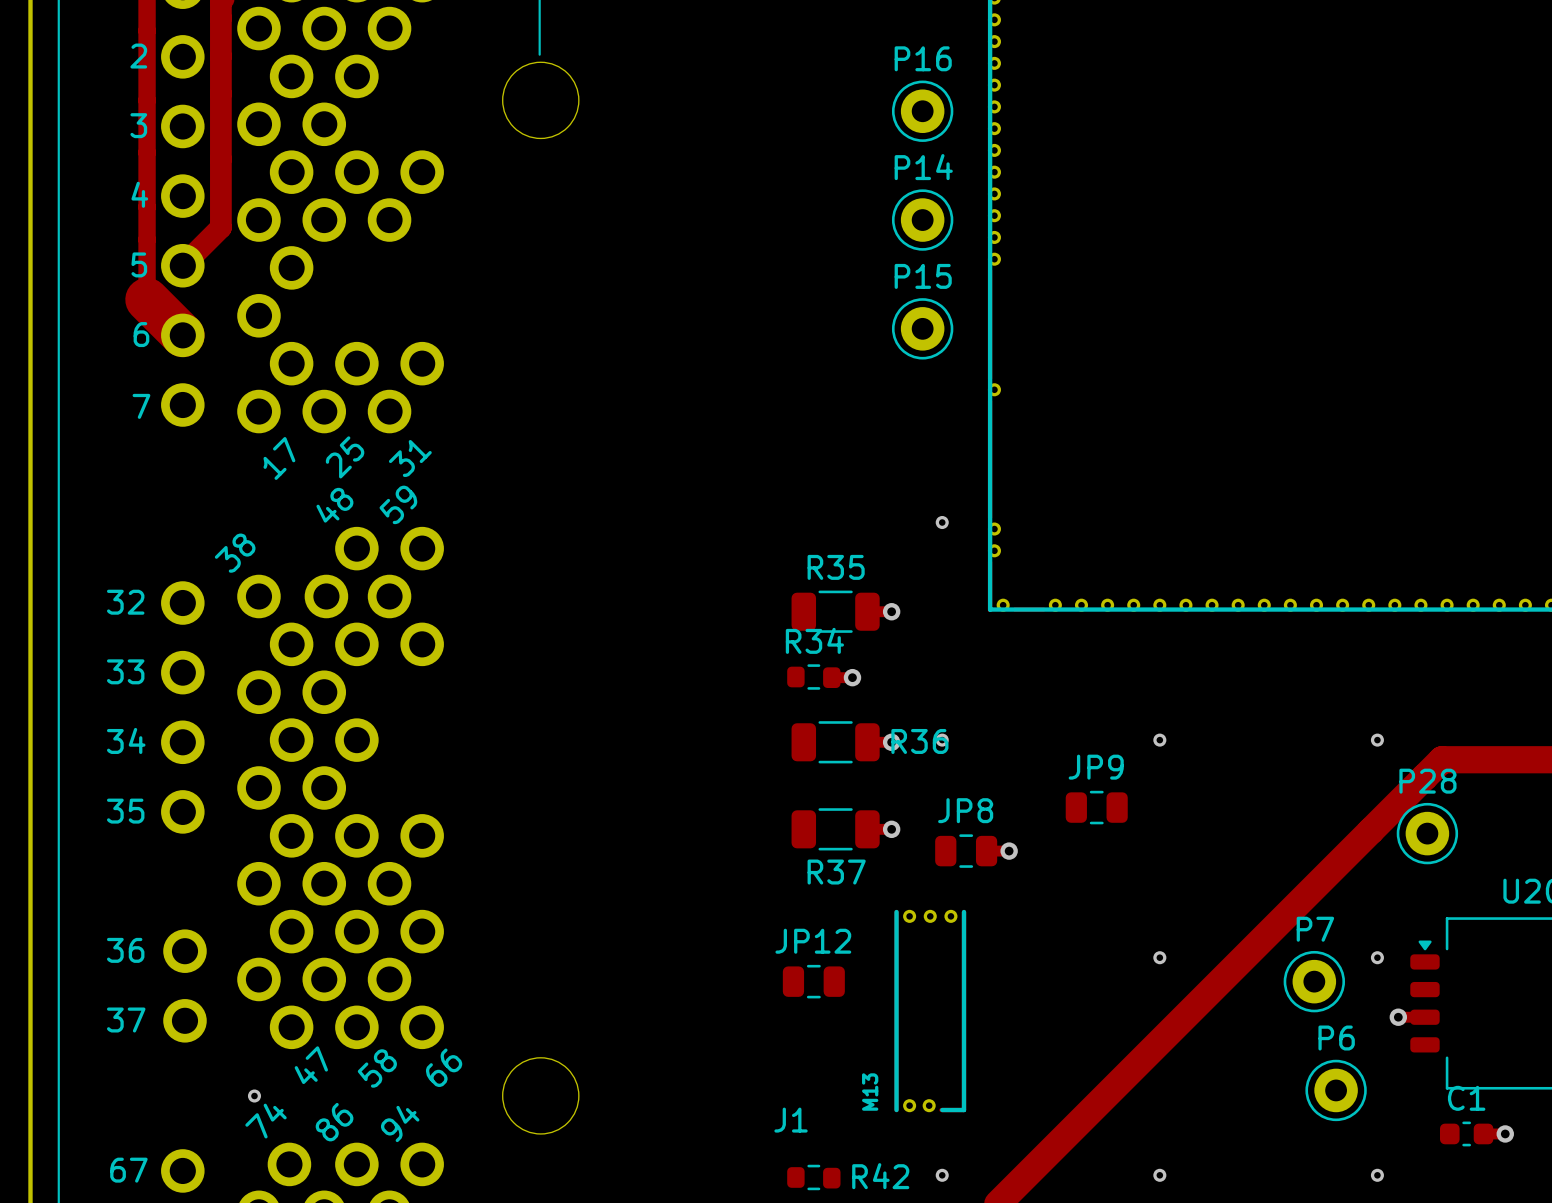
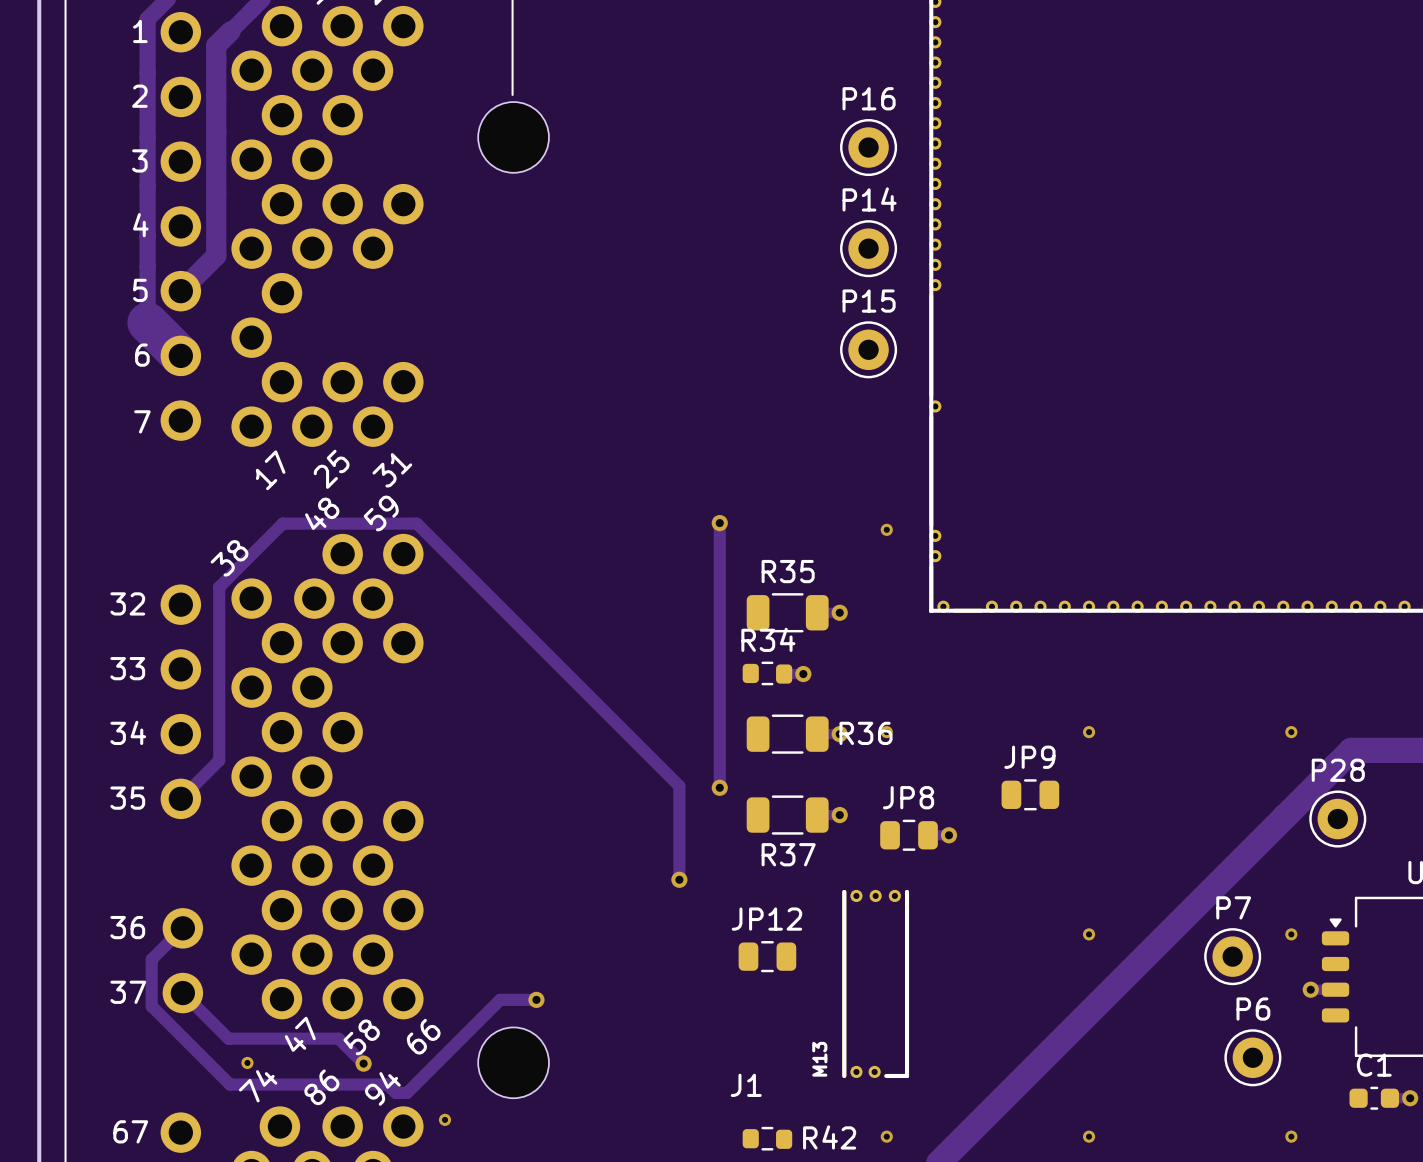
track: none -> (719, 523) (719, 787)
via: none -> (719, 523)
via: none -> (719, 787)
track: none -> (180, 798) (219, 760) (219, 587) (282, 523) (416, 523) (679, 786) (679, 879)
via: none -> (679, 879)
track: none -> (182, 928) (151, 959) (151, 1006) (230, 1084) (387, 1084) (395, 1092) (407, 1092) (500, 999) (536, 999)
track: none -> (182, 993) (228, 1038) (338, 1038) (363, 1063)
via: none -> (536, 999)
via: none -> (363, 1063)
via: none -> (444, 1119)

